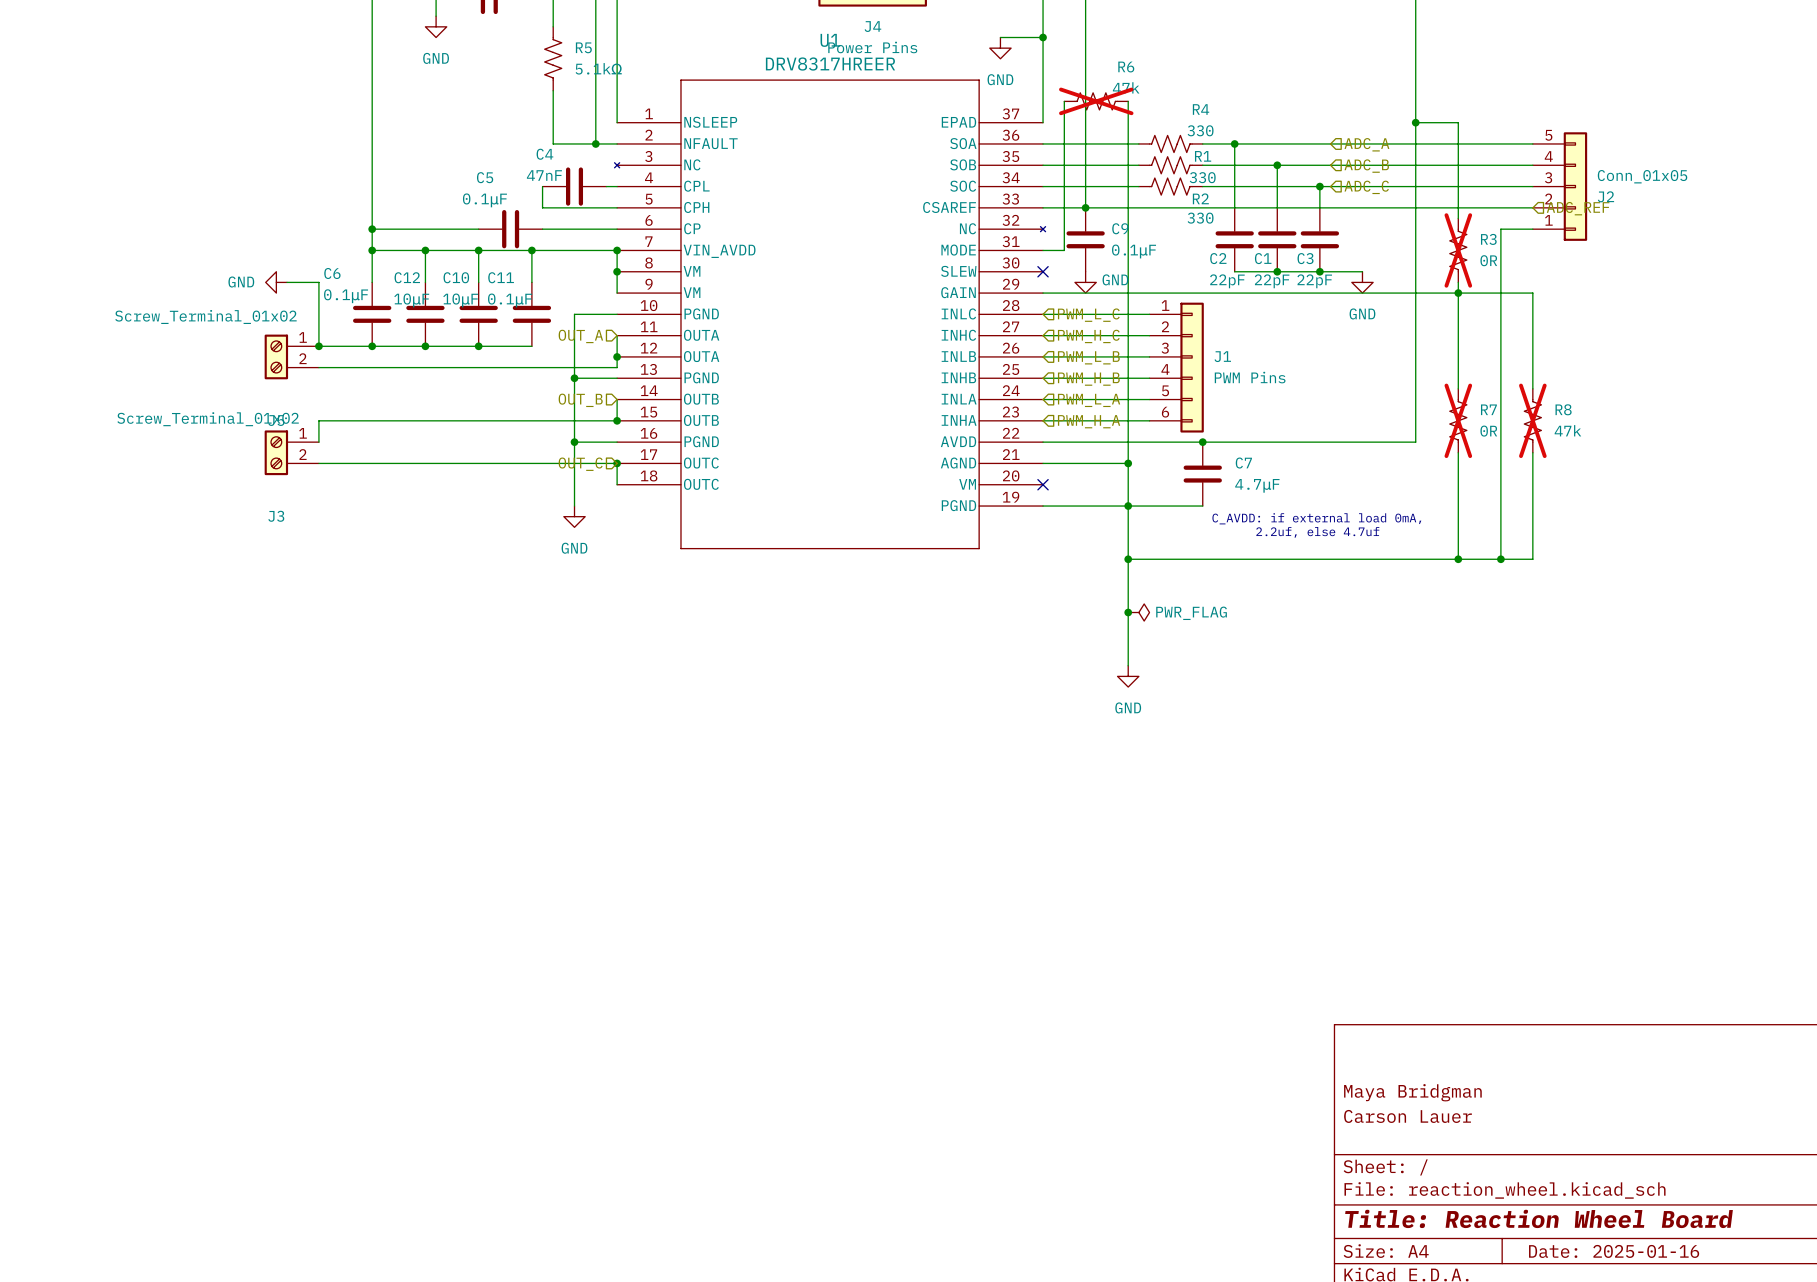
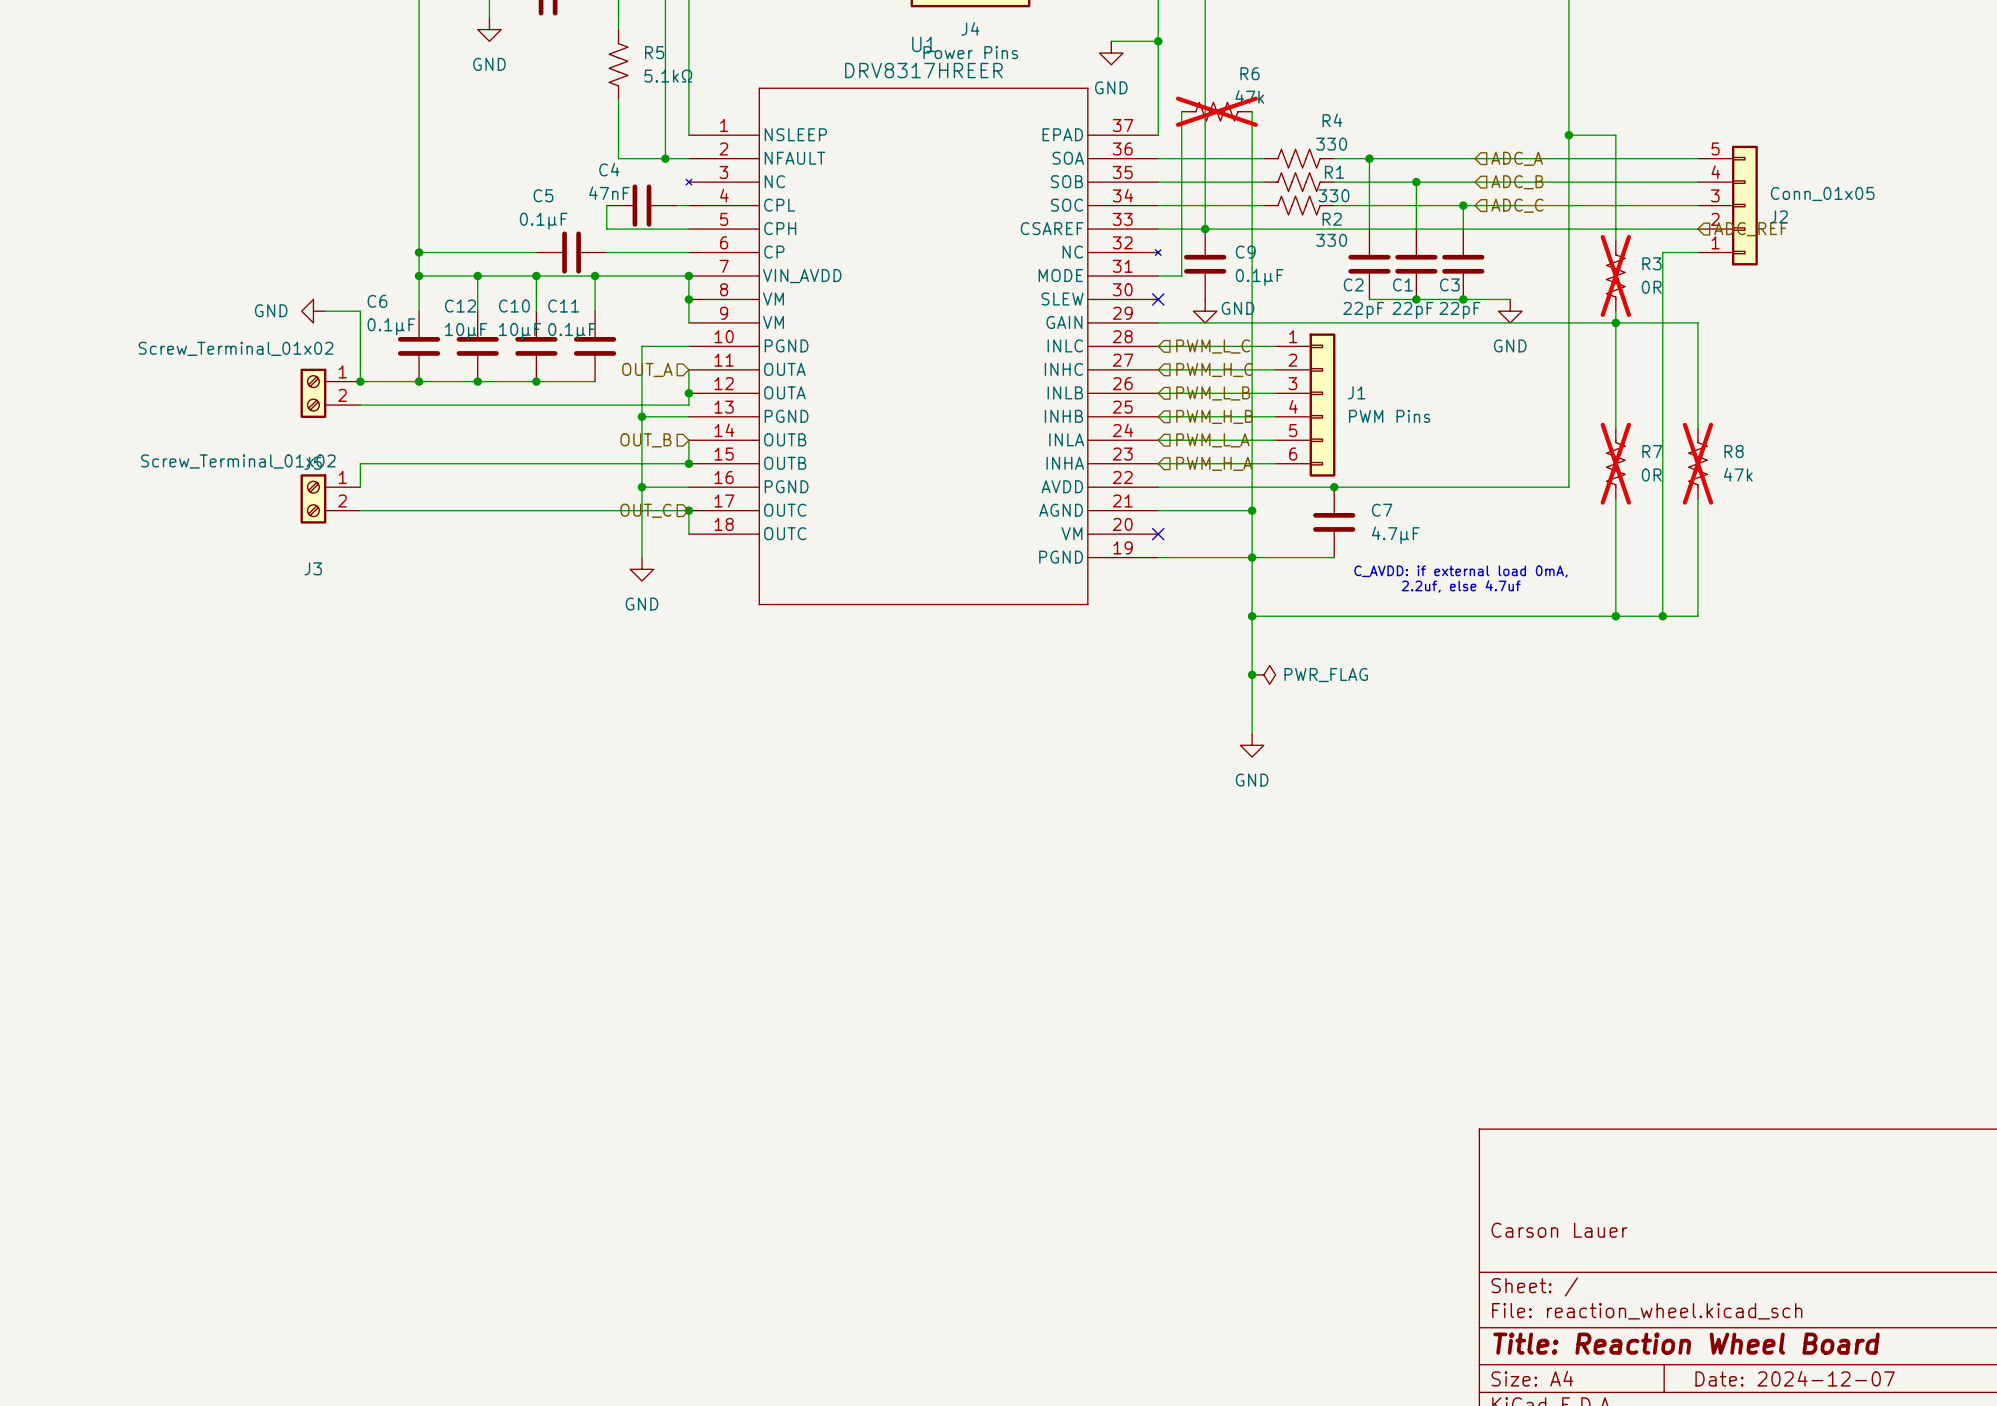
title block: Maya Bridgman (1412, 1092) -> none
title block: Date: 2025-01-16 (1614, 1251) -> Date: 2024-12-07 (1795, 1378)

